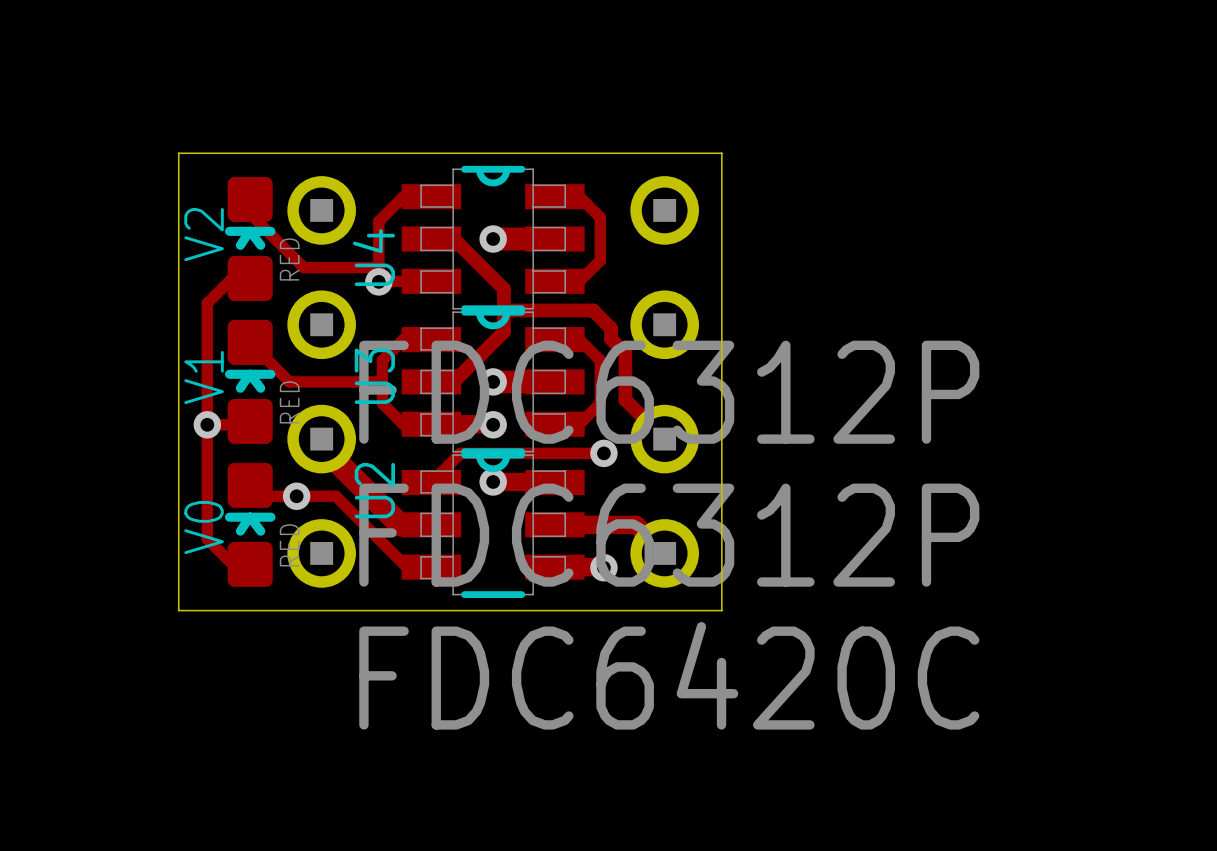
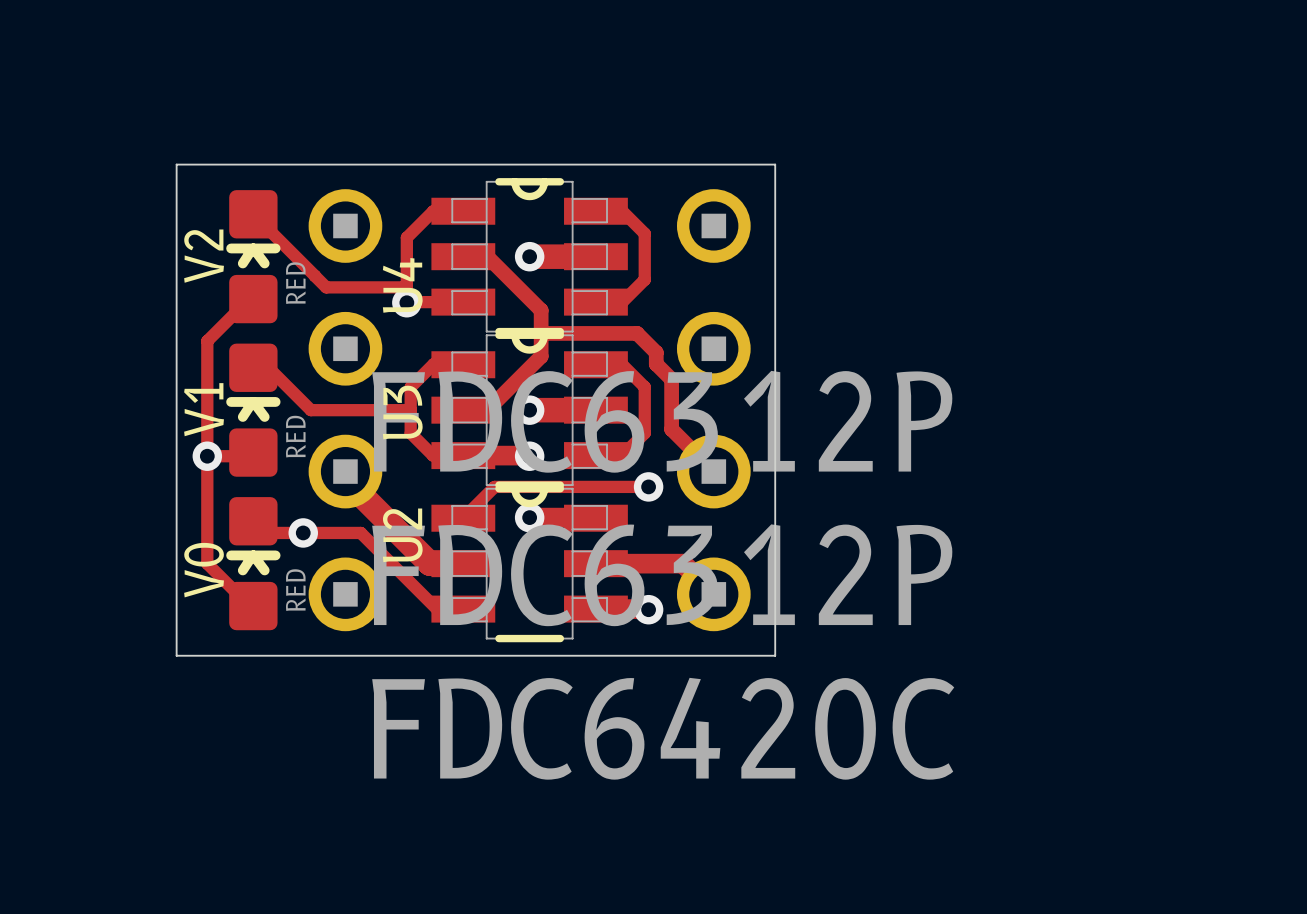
board edge: (178, 153) (178, 610) -> (191, 164) (176, 164) (176, 655) (191, 655)
V2 position: (250, 239) -> (253, 256)
track: (207, 303) (207, 539) -> (222, 325) (207, 341) (207, 563) (222, 579)
V1 position: (250, 381) -> (253, 410)
via position: (207, 424) -> (207, 456)
via position: (296, 496) -> (303, 532)
V0 position: (250, 524) -> (253, 563)

